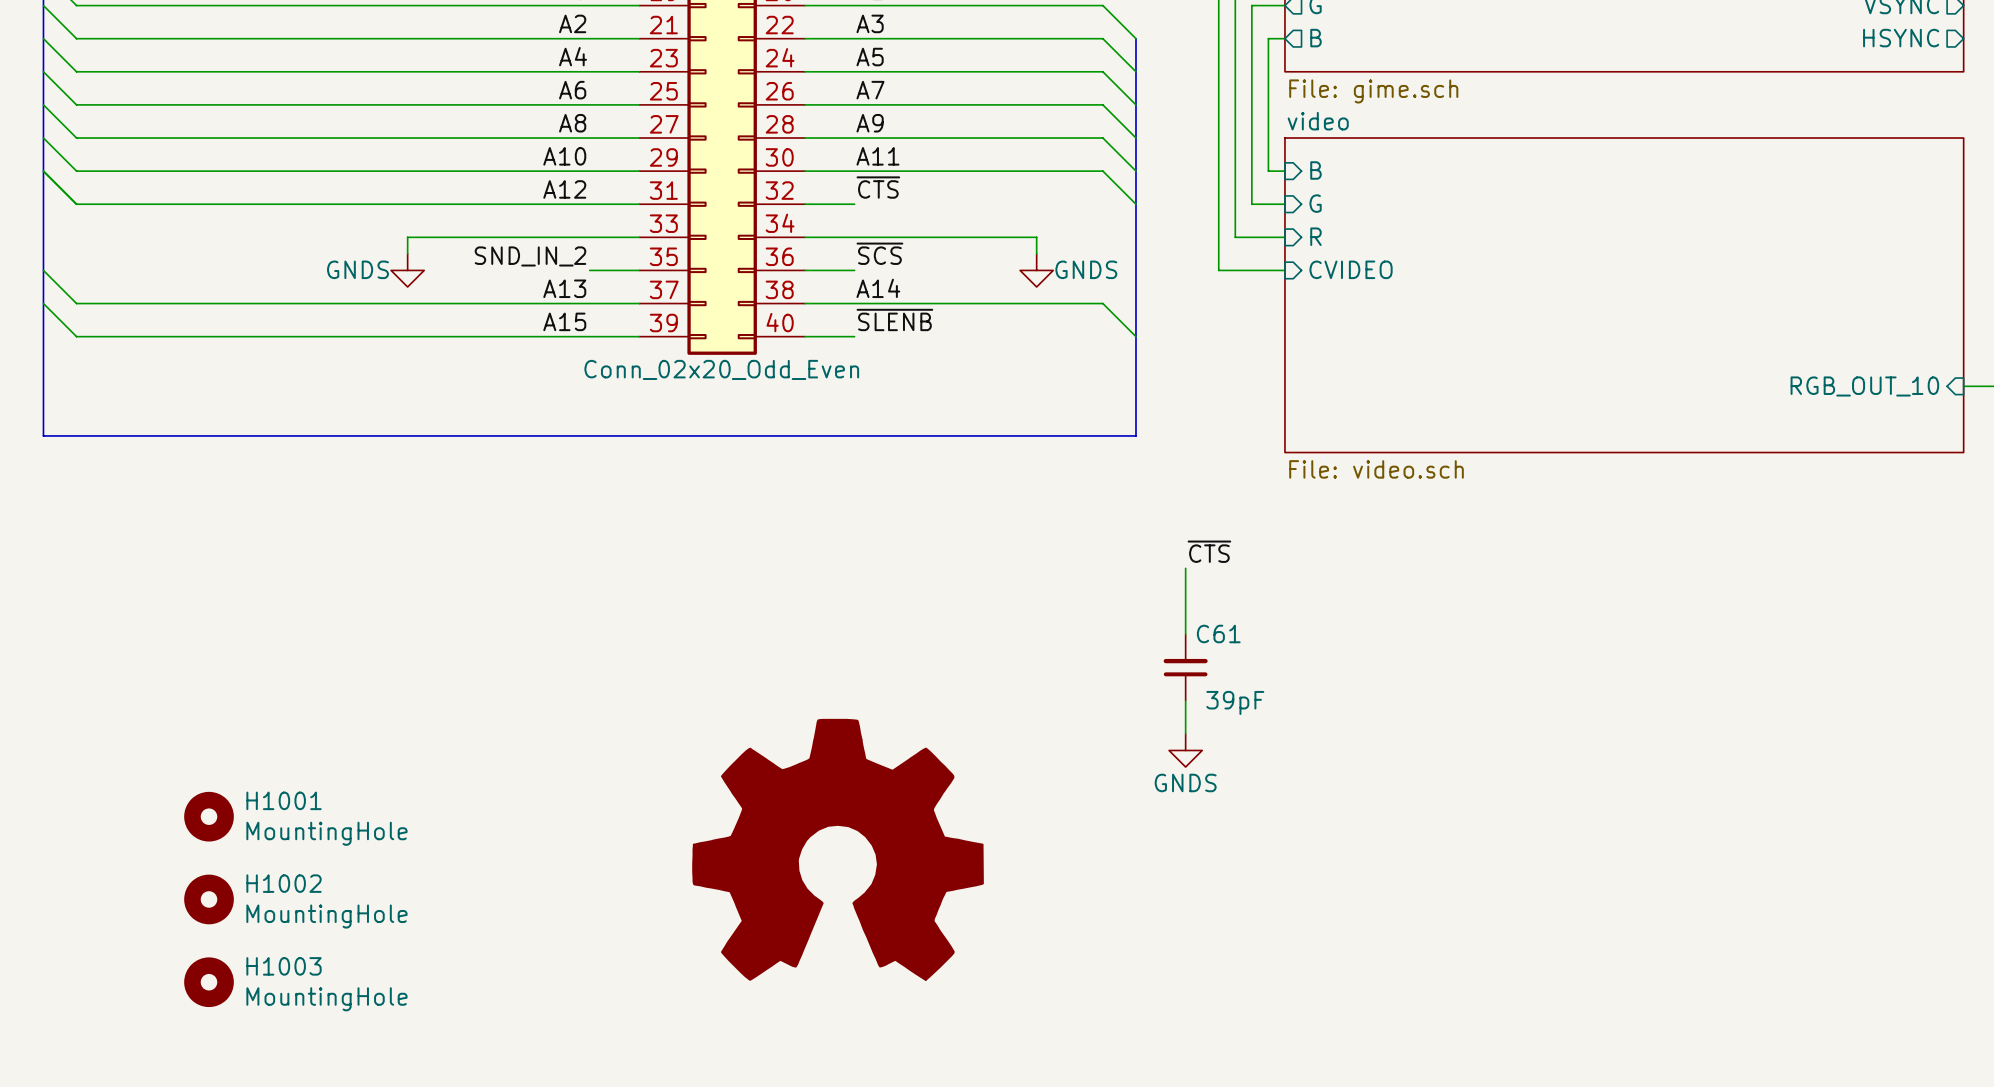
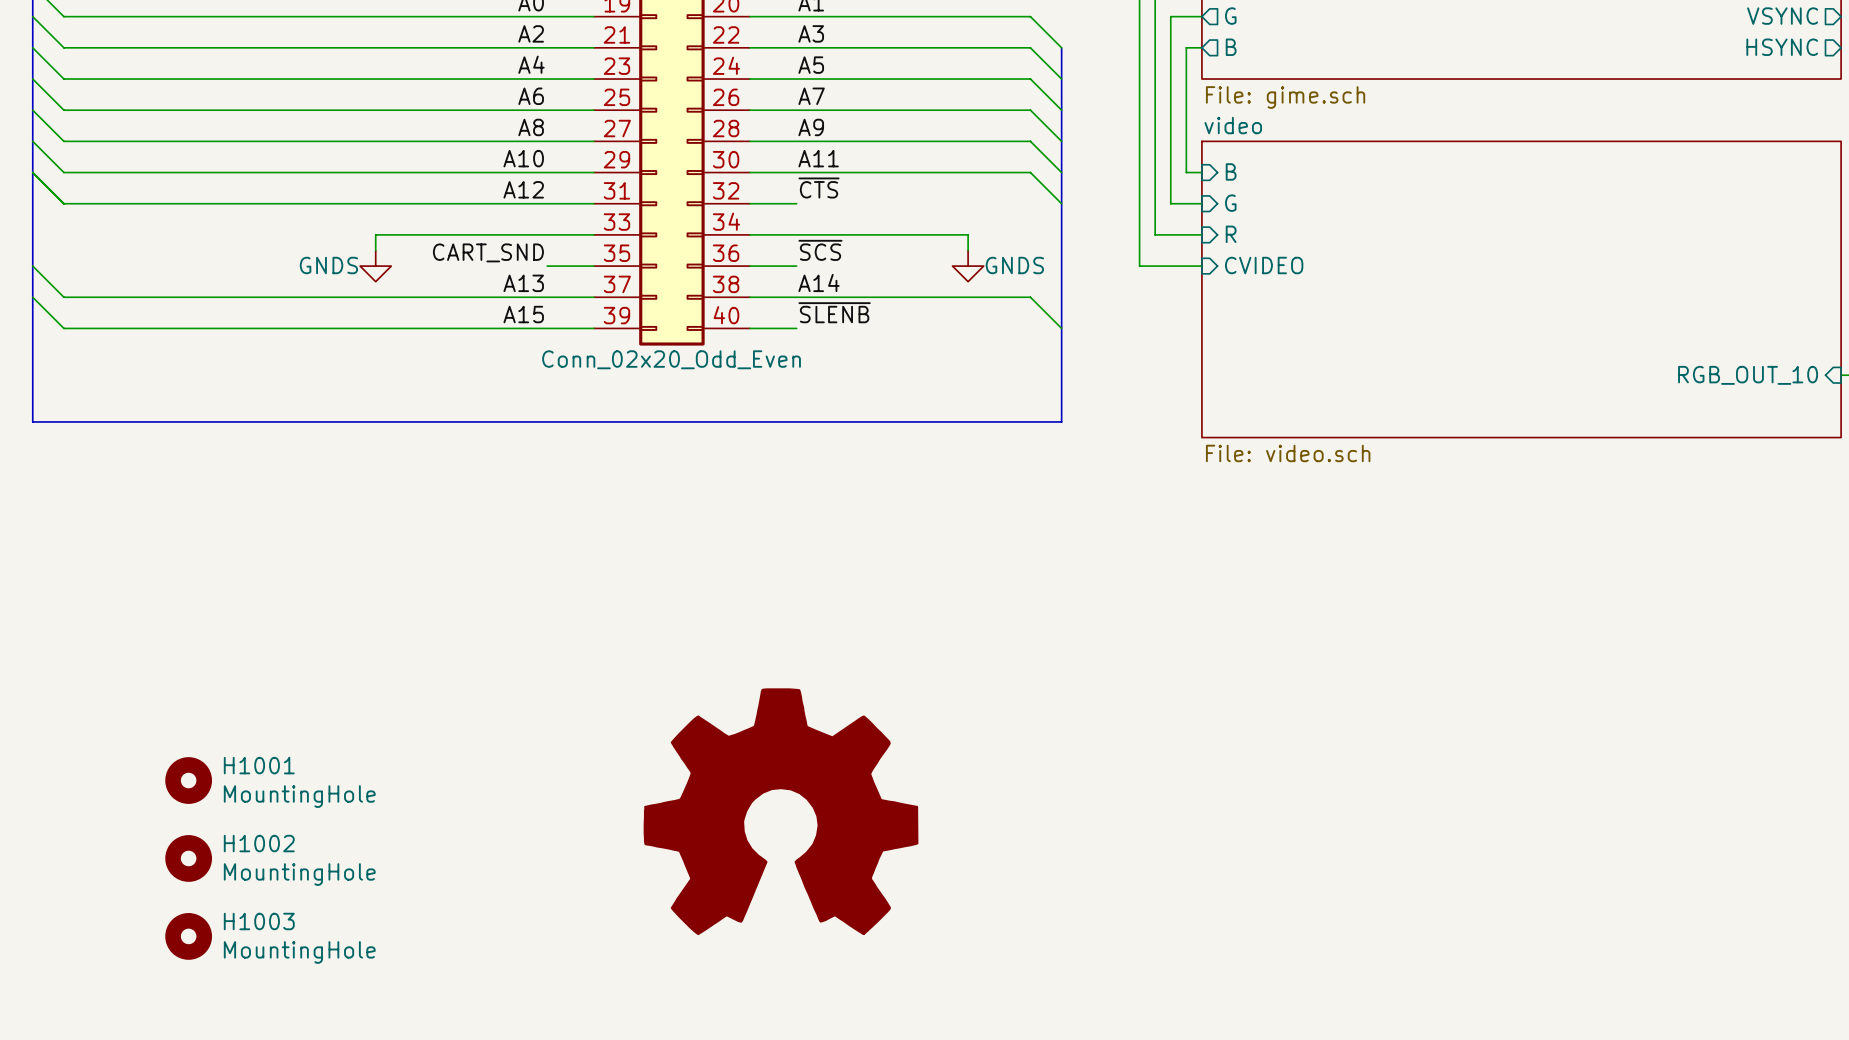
label: SND_IN_2 (530, 256) -> CART_SND (488, 252)
label: ~{CTS} (1209, 551) -> none
wire: (1185, 568) (1185, 634) -> none
C61: 39pF (1185, 667) -> none
wire: (1185, 700) (1185, 733) -> none
power symbol: GNDS (1185, 750) -> none

